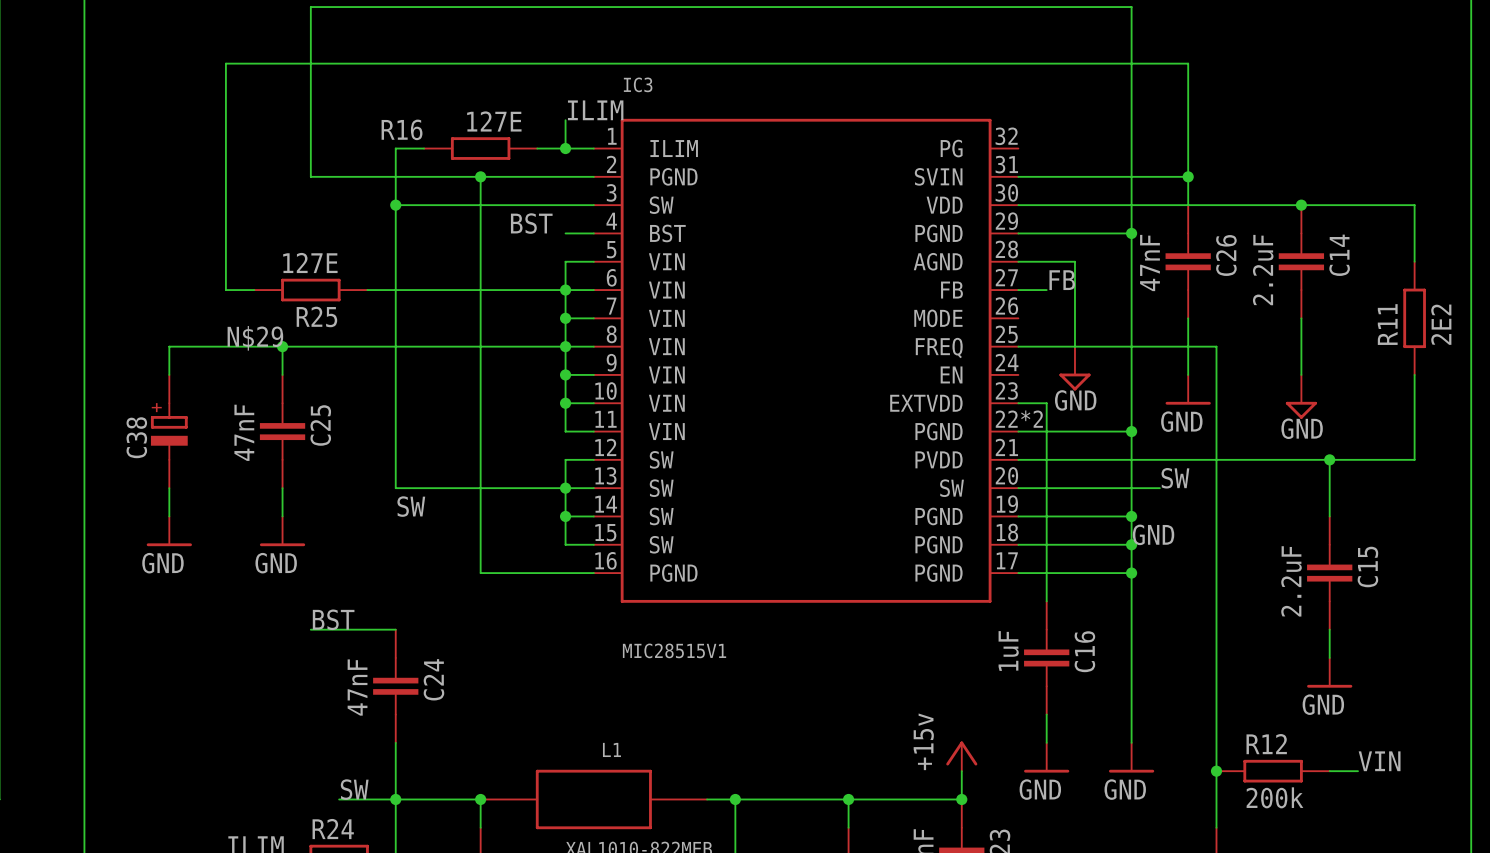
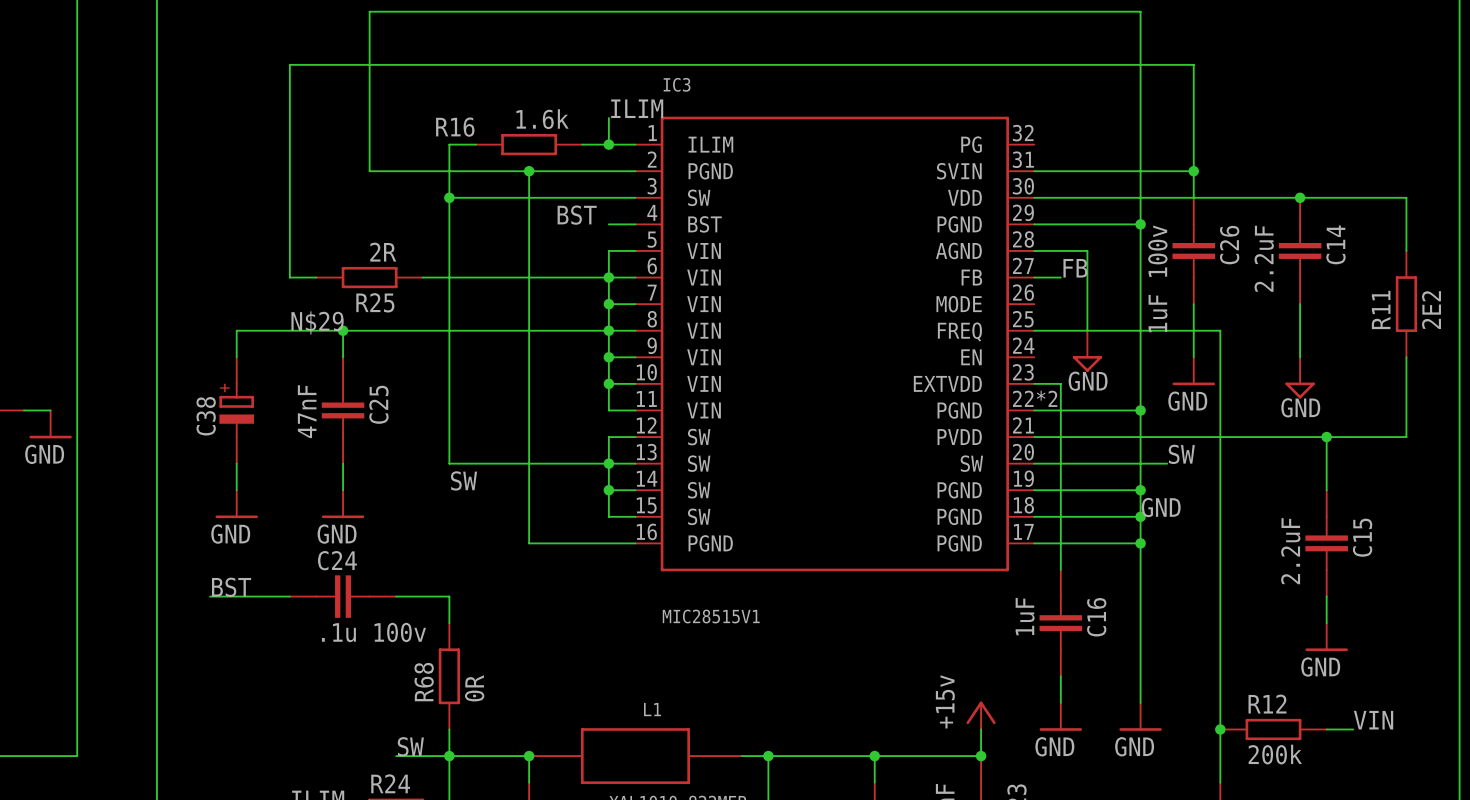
R16 value: 127E (494, 121) -> 1.6k (542, 119)
R25 value: 127E (310, 262) -> 2R (383, 252)
C26 value: 47nF (1149, 263) -> 1uF 100v (1157, 278)
label position: BST (333, 619) -> BST (231, 587)
wire: none -> (210, 596) (289, 596)
C24 name position: C24 (433, 679) -> C24 (337, 560)
C24 rotation: 0° (395, 686) -> 90° clockwise (343, 596)
C24 position: (395, 686) -> (343, 596)
C24 value: 47nF (357, 687) -> .1u 100v (373, 632)
R68: none -> 0R (449, 676)

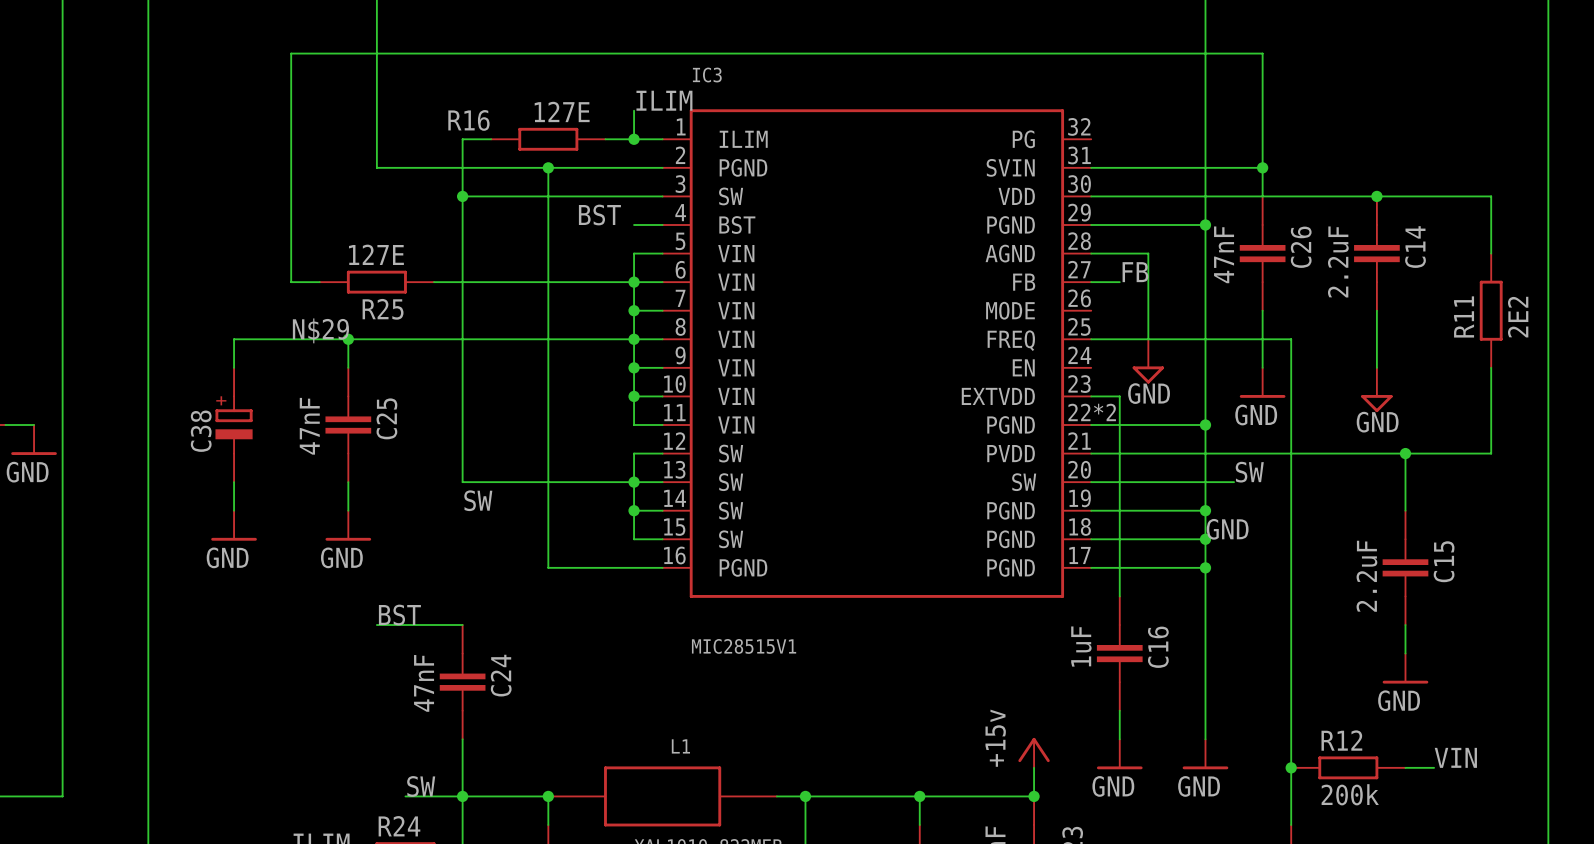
R16 value: 1.6k (542, 119) -> 127E (562, 111)
R25 value: 2R (383, 252) -> 127E (376, 254)
C26 value: 1uF 100v (1157, 278) -> 47nF (1224, 254)
label position: BST (231, 587) -> BST (399, 615)
wire: (210, 596) (289, 596) -> none
C24 rotation: 0° (343, 596) -> 90° clockwise (462, 682)
C24 position: (343, 596) -> (462, 682)
C24 value: .1u 100v (373, 632) -> 47nF (424, 683)
R68: 0R (449, 676) -> none

